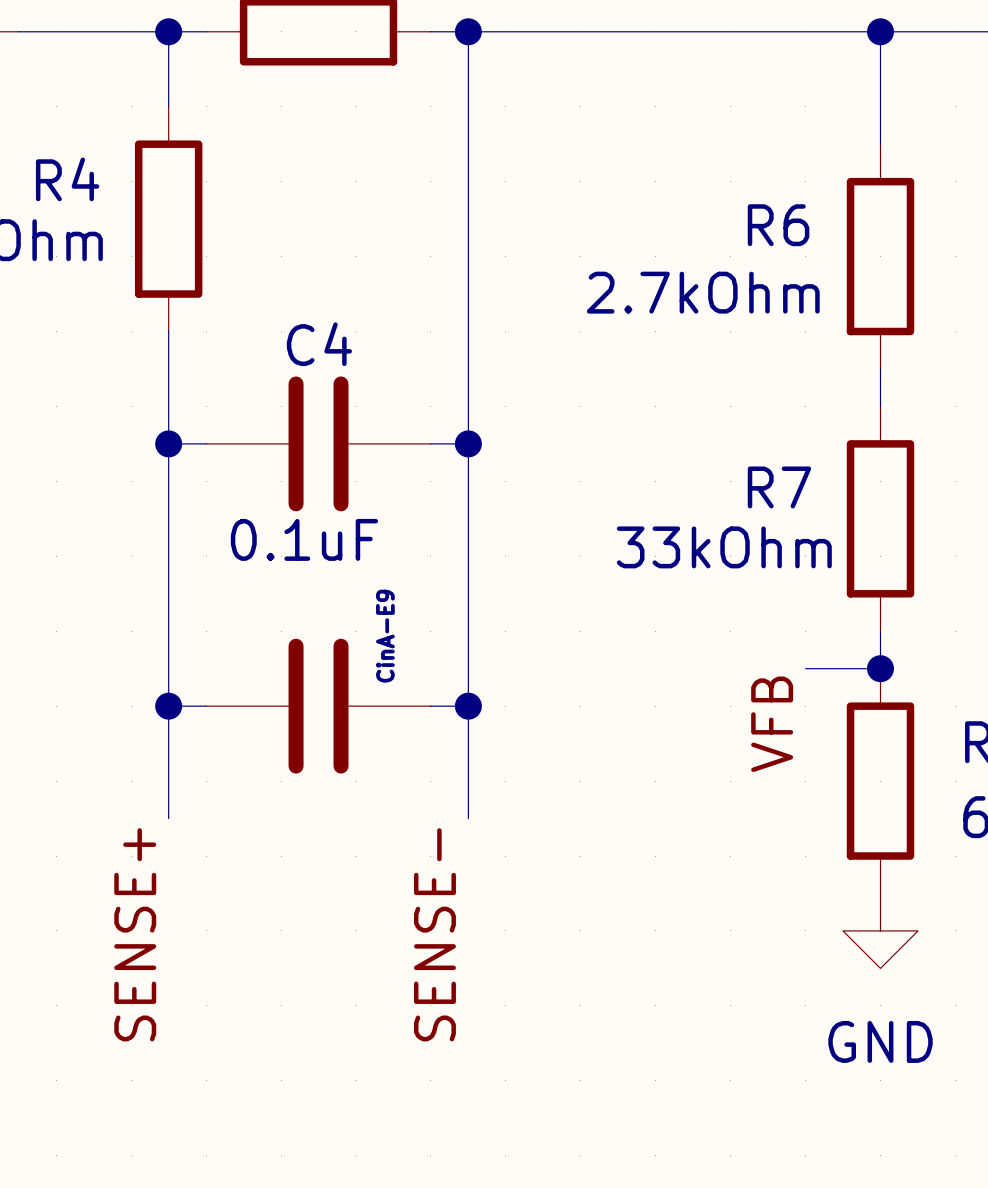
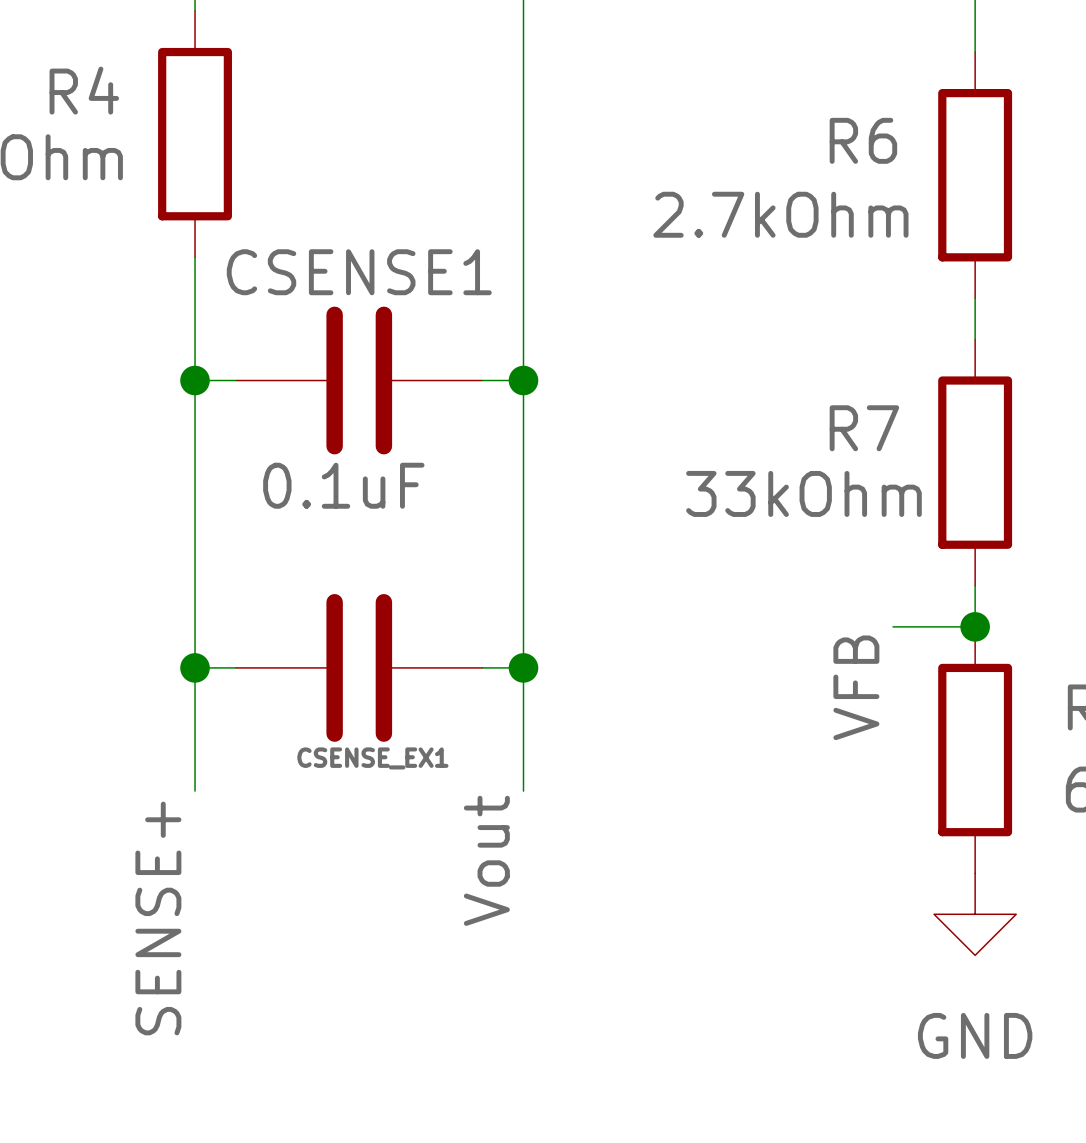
C4 name: C4 (319, 344) -> CSENSE1 (359, 272)
CinA-E9 name: CinA-E9 (385, 636) -> CSENSE_EX1 (372, 758)
label: SENSE- (434, 934) -> Vout (486, 860)

